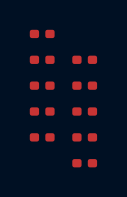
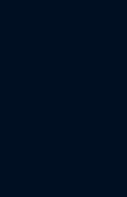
part: (42, 33) -> none
part: (42, 59) -> none
part: (84, 59) -> none
part: (42, 85) -> none
part: (84, 85) -> none
part: (42, 111) -> none
part: (84, 111) -> none
part: (42, 137) -> none
part: (84, 137) -> none
part: (84, 163) -> none

